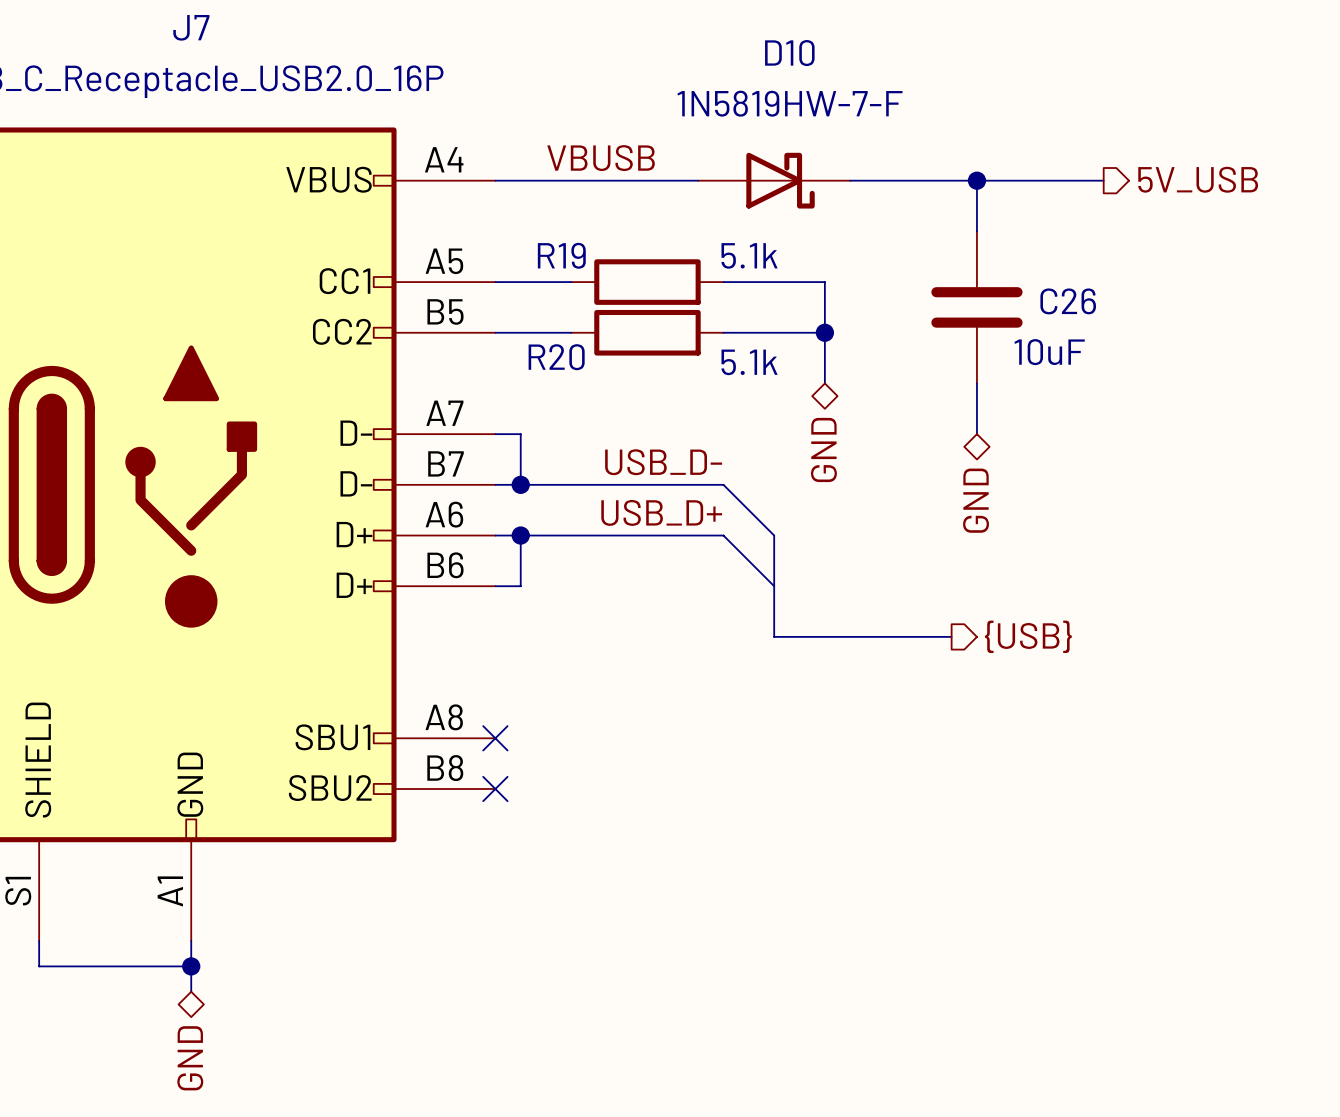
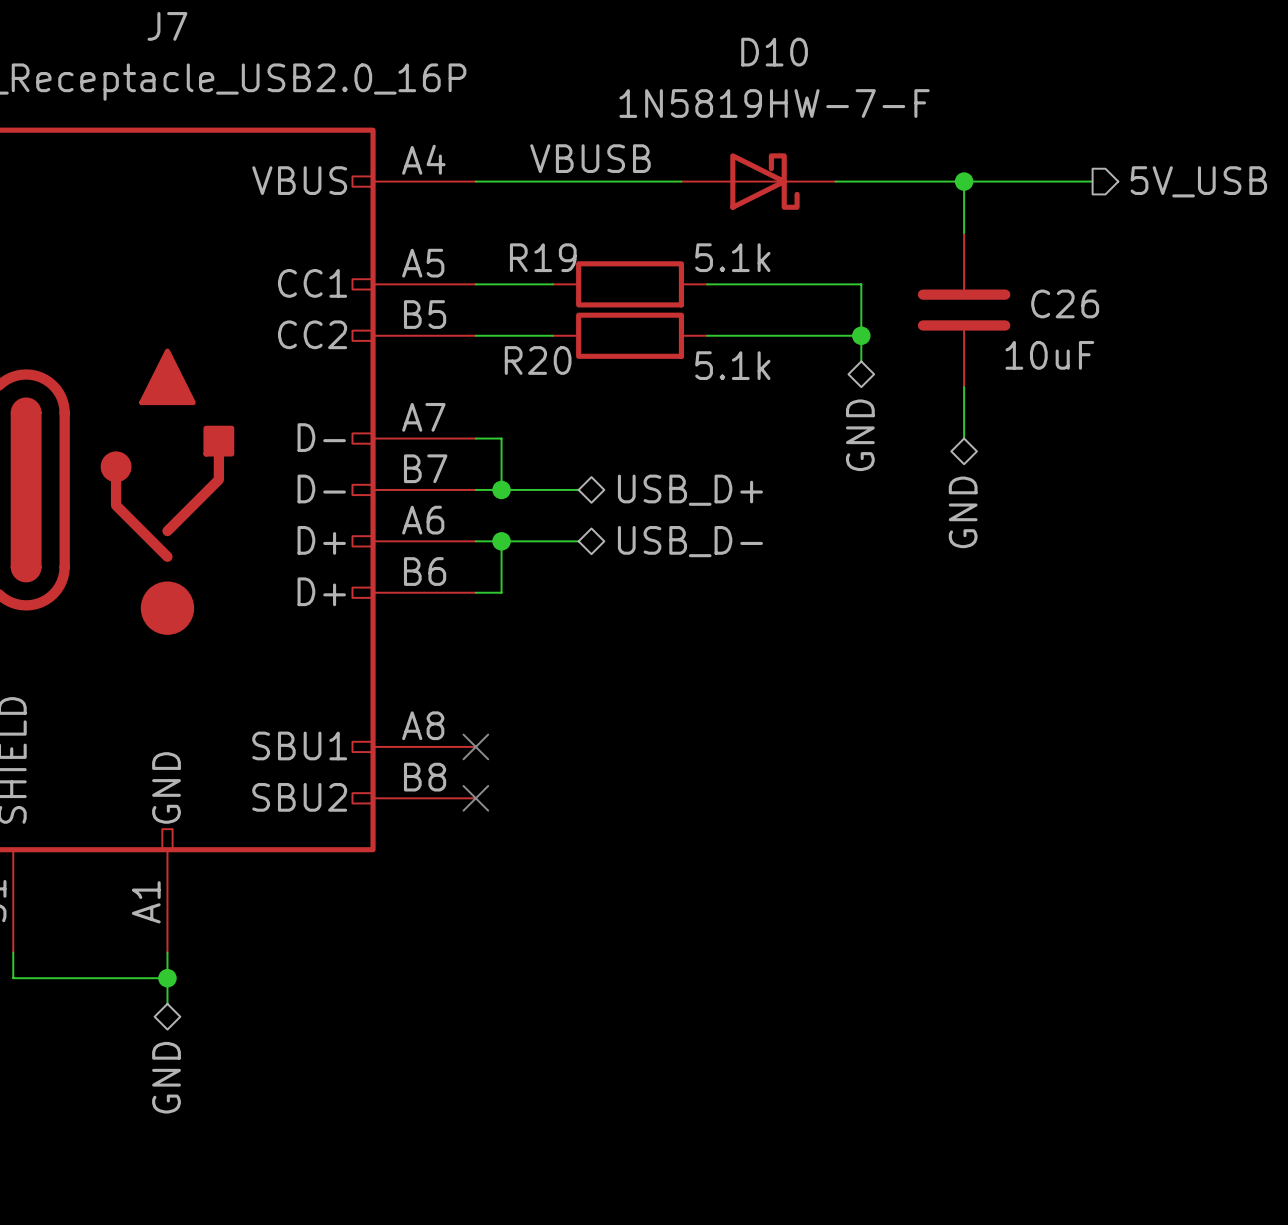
wire: (824, 282) (824, 383) -> (809, 284) (861, 284) (861, 361)
wire: none -> (809, 335) (861, 335)
junction position: (824, 332) -> (861, 335)
hierarchical label position: GND (823, 449) -> GND (860, 435)
label: USB_D- (663, 462) -> none
hierarchical label: none -> USB_D+ (690, 490)
wire: (596, 484) (723, 484) (774, 535) -> none
label: USB_D+ (661, 512) -> none
hierarchical label: none -> USB_D- (690, 541)
wire: (596, 535) (723, 535) (774, 586) -> none
bus: (774, 535) (774, 636) (951, 636) -> none
hierarchical label: {USB} (1028, 636) -> none

